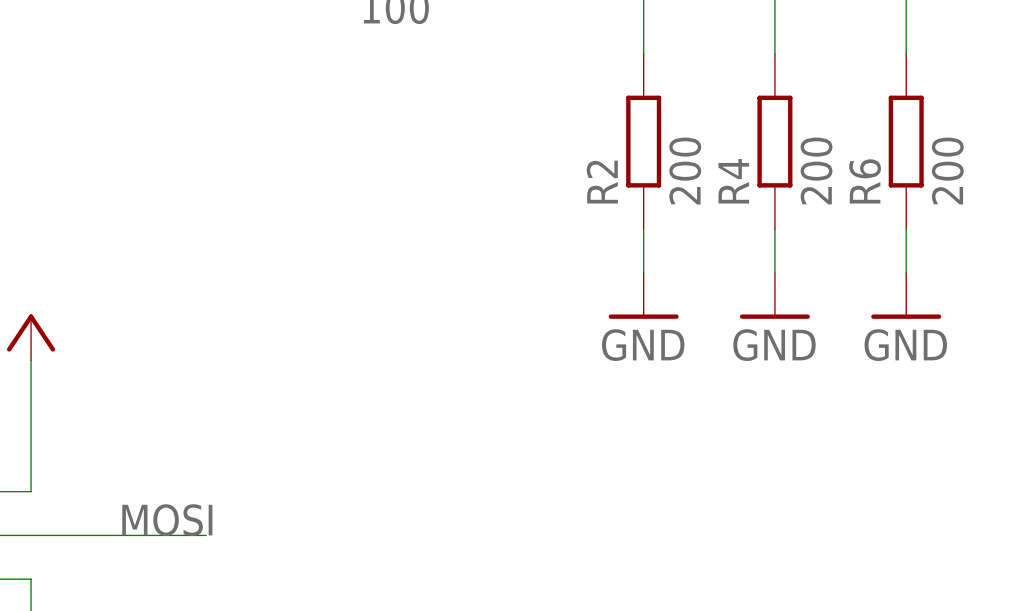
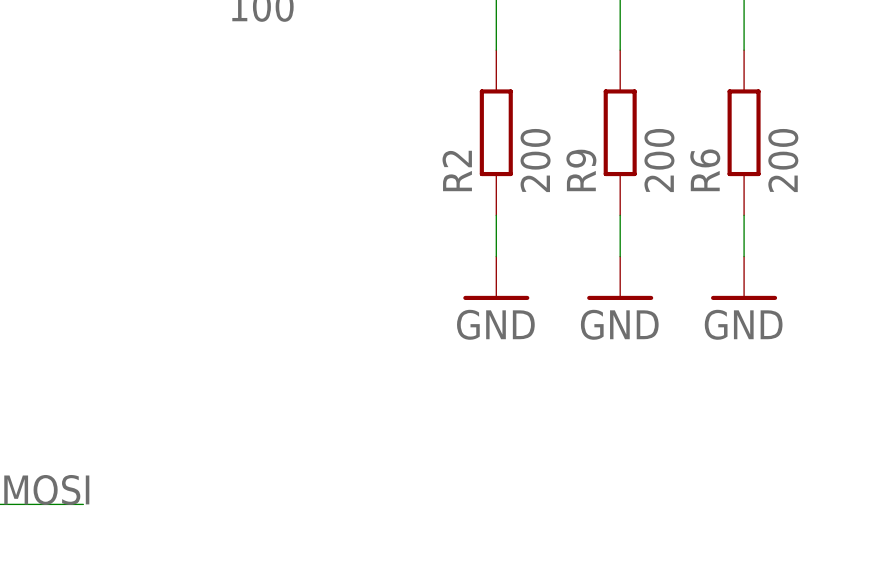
R4 name: R4 (733, 181) -> R9 (581, 170)

